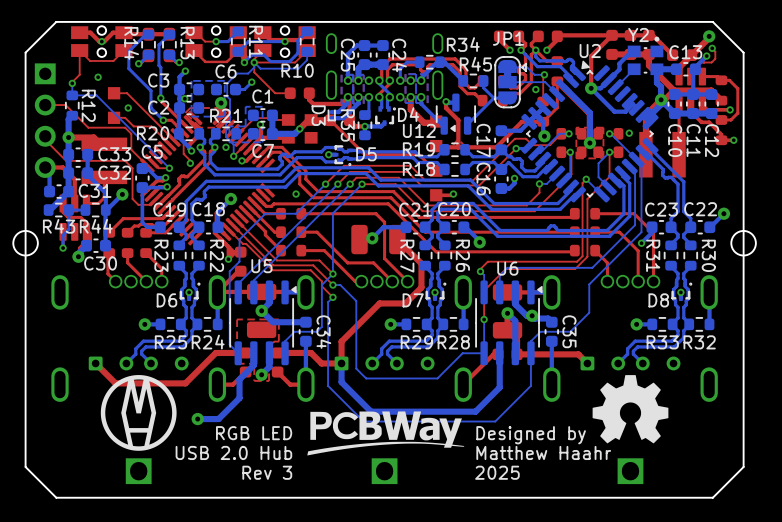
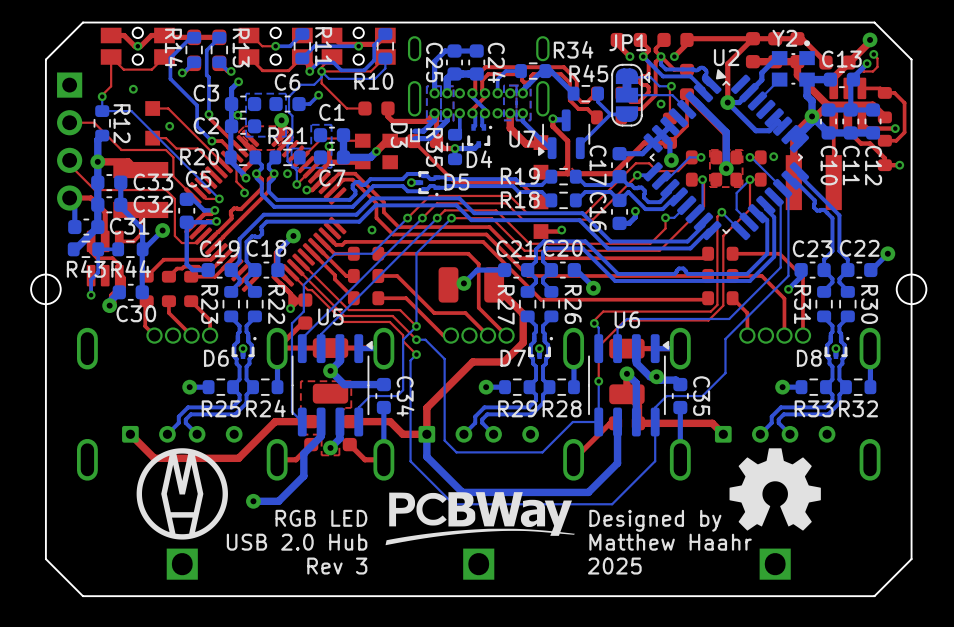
D4 name position: D4 (408, 114) -> D4 (479, 159)
U12: (455, 114) -> none
U7: none -> (564, 134)

